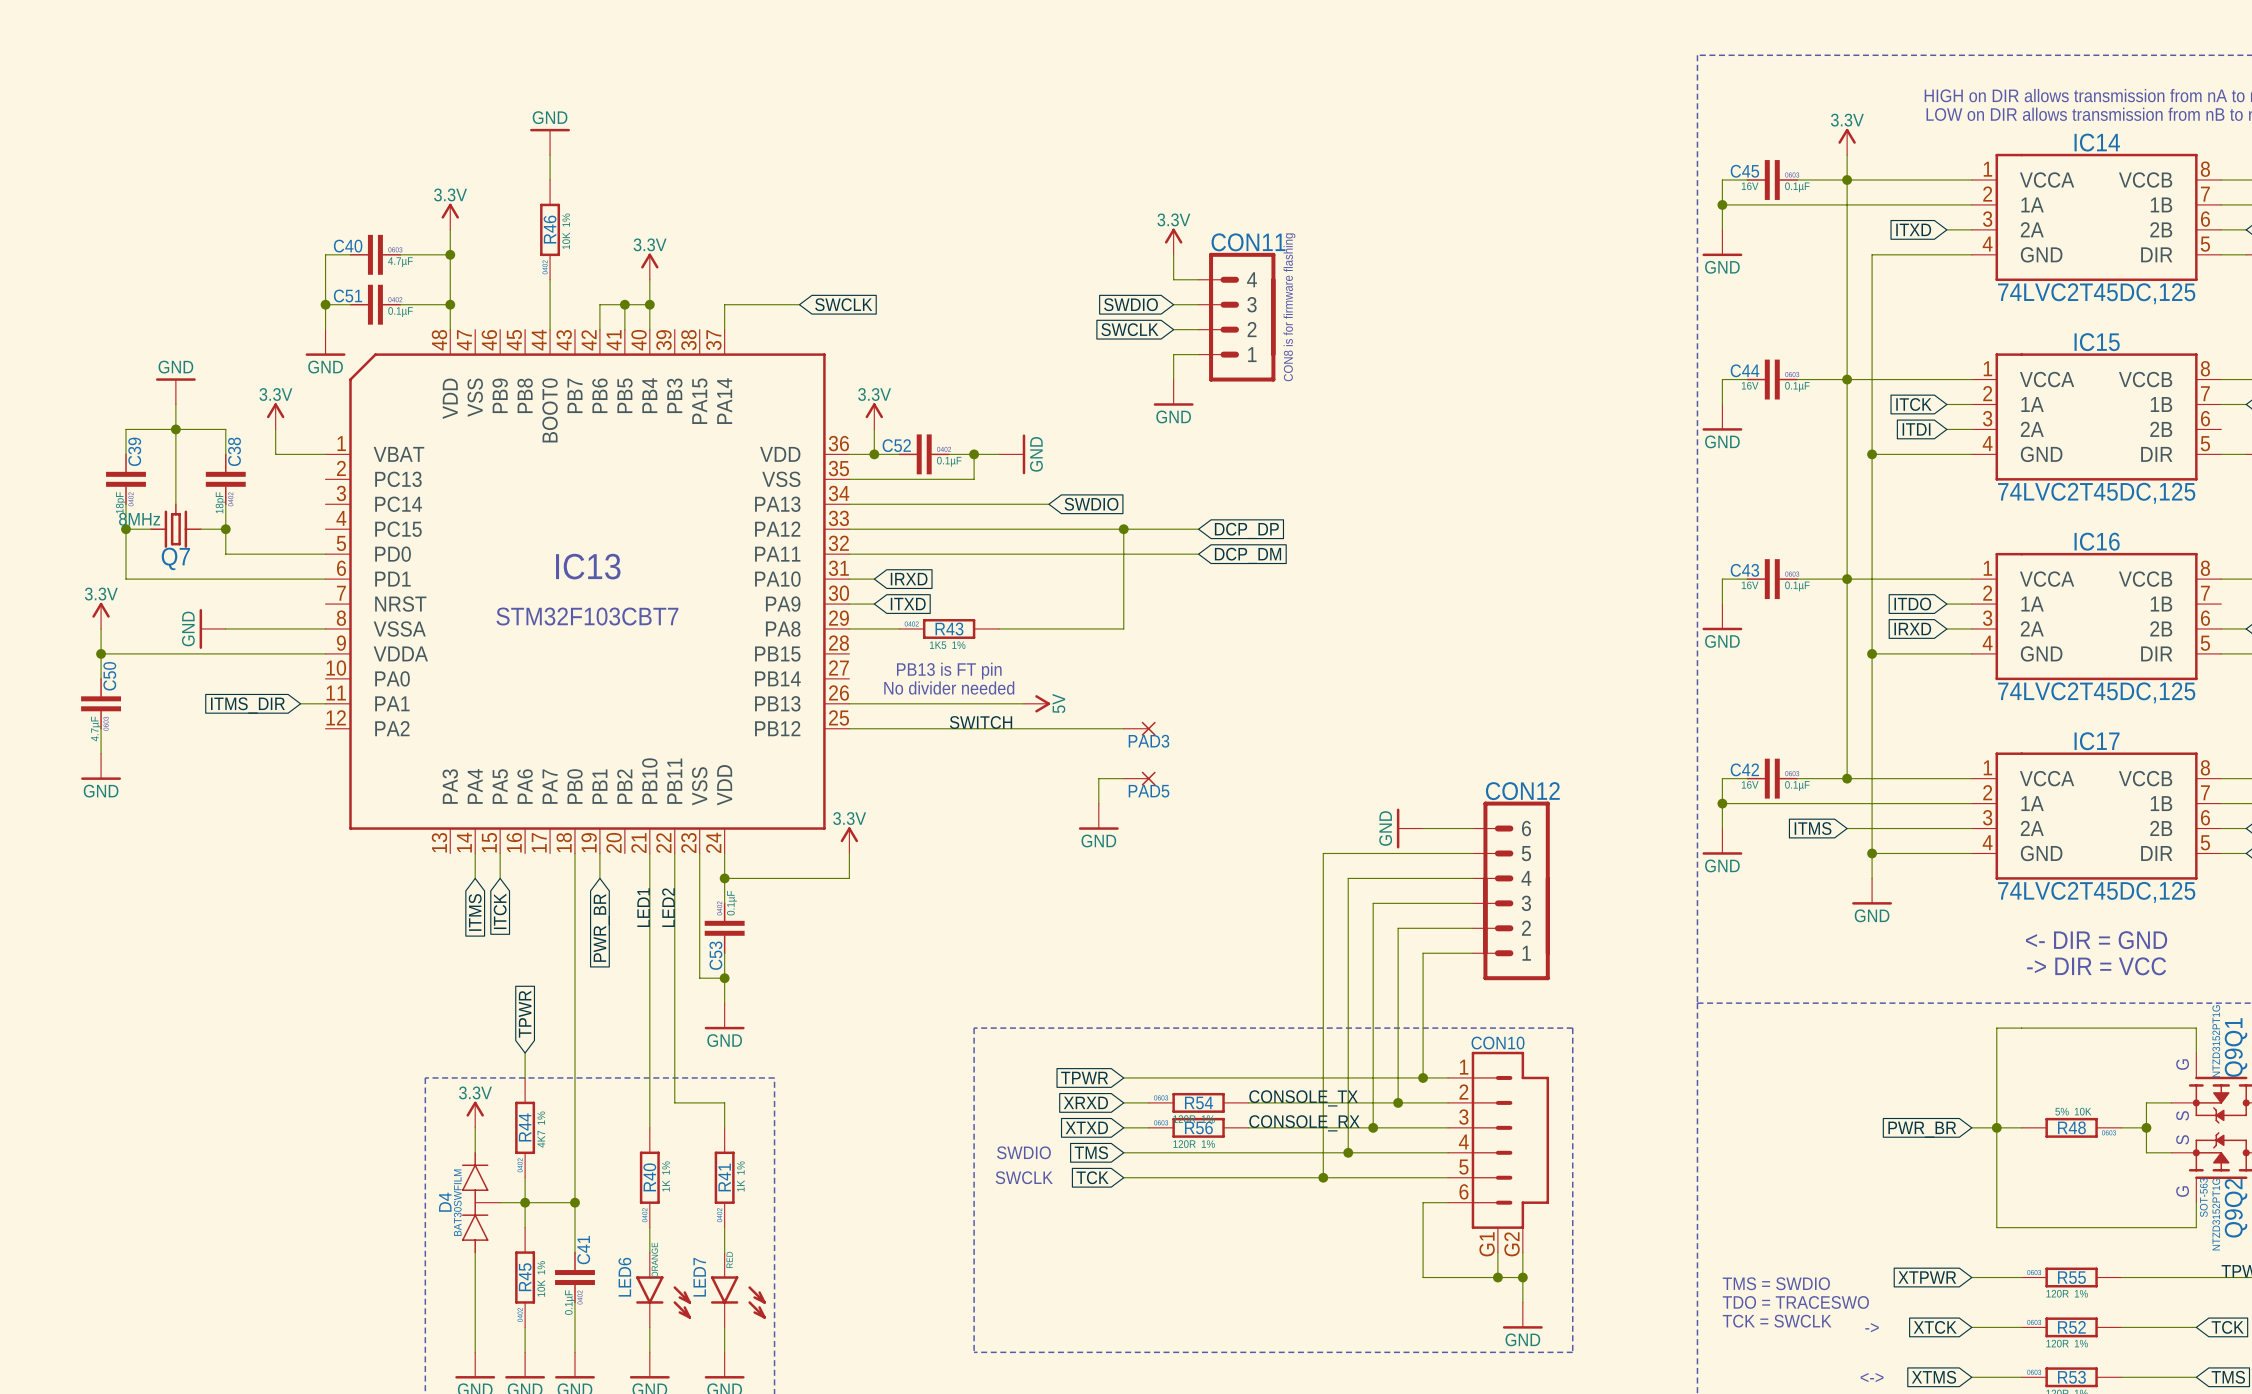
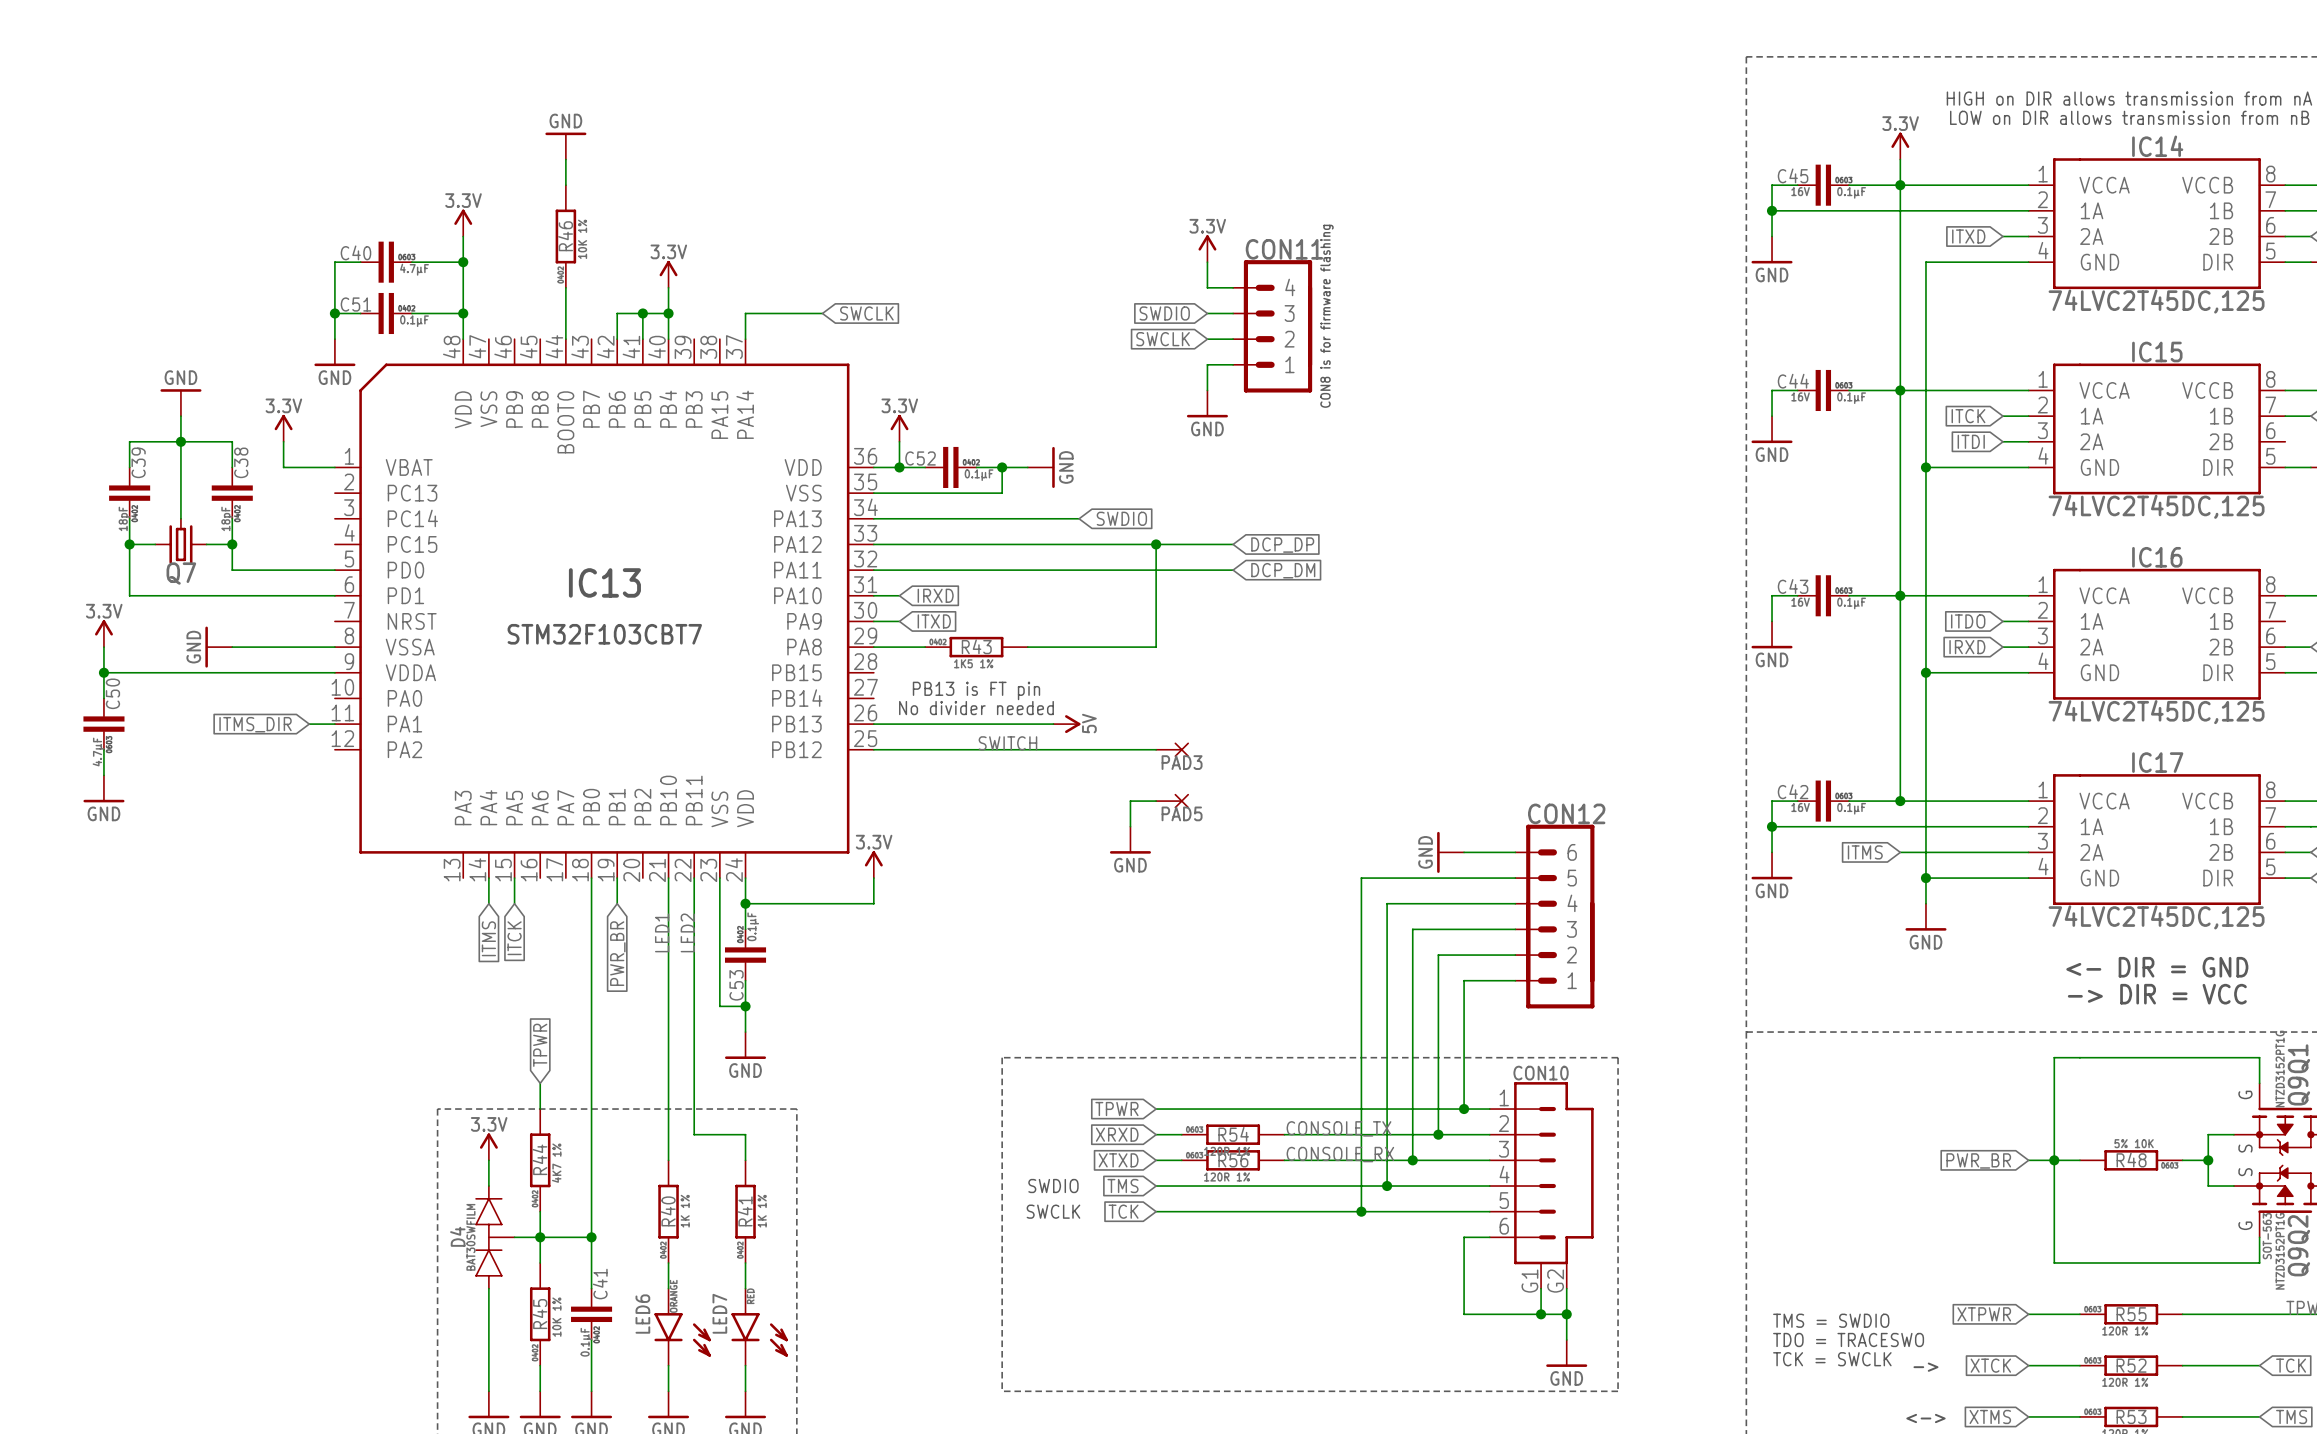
Q7 value: 8MHz (139, 519) -> none

